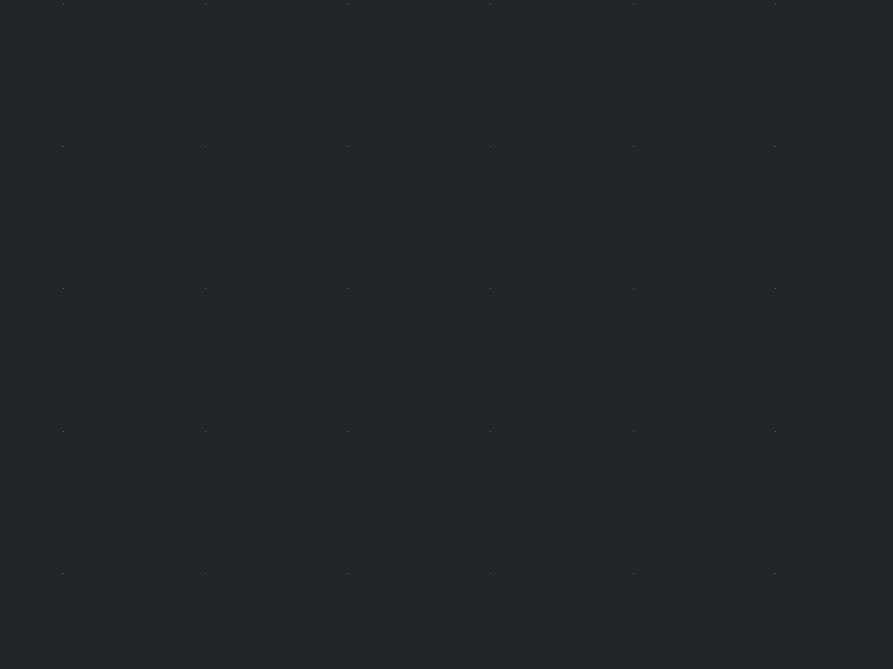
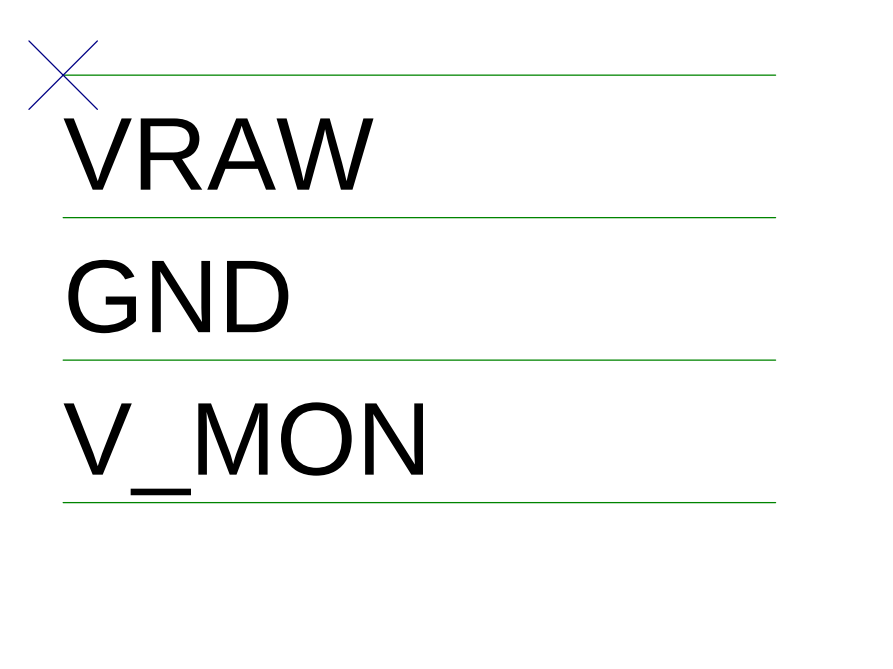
wire: none -> (63, 75) (775, 75)
no-connect mark: none -> (63, 75)
label: none -> VRAW (218, 154)
wire: none -> (63, 217) (775, 217)
label: none -> GND (178, 296)
wire: none -> (63, 360) (775, 360)
label: none -> V_MON (243, 448)
wire: none -> (63, 502) (775, 502)

